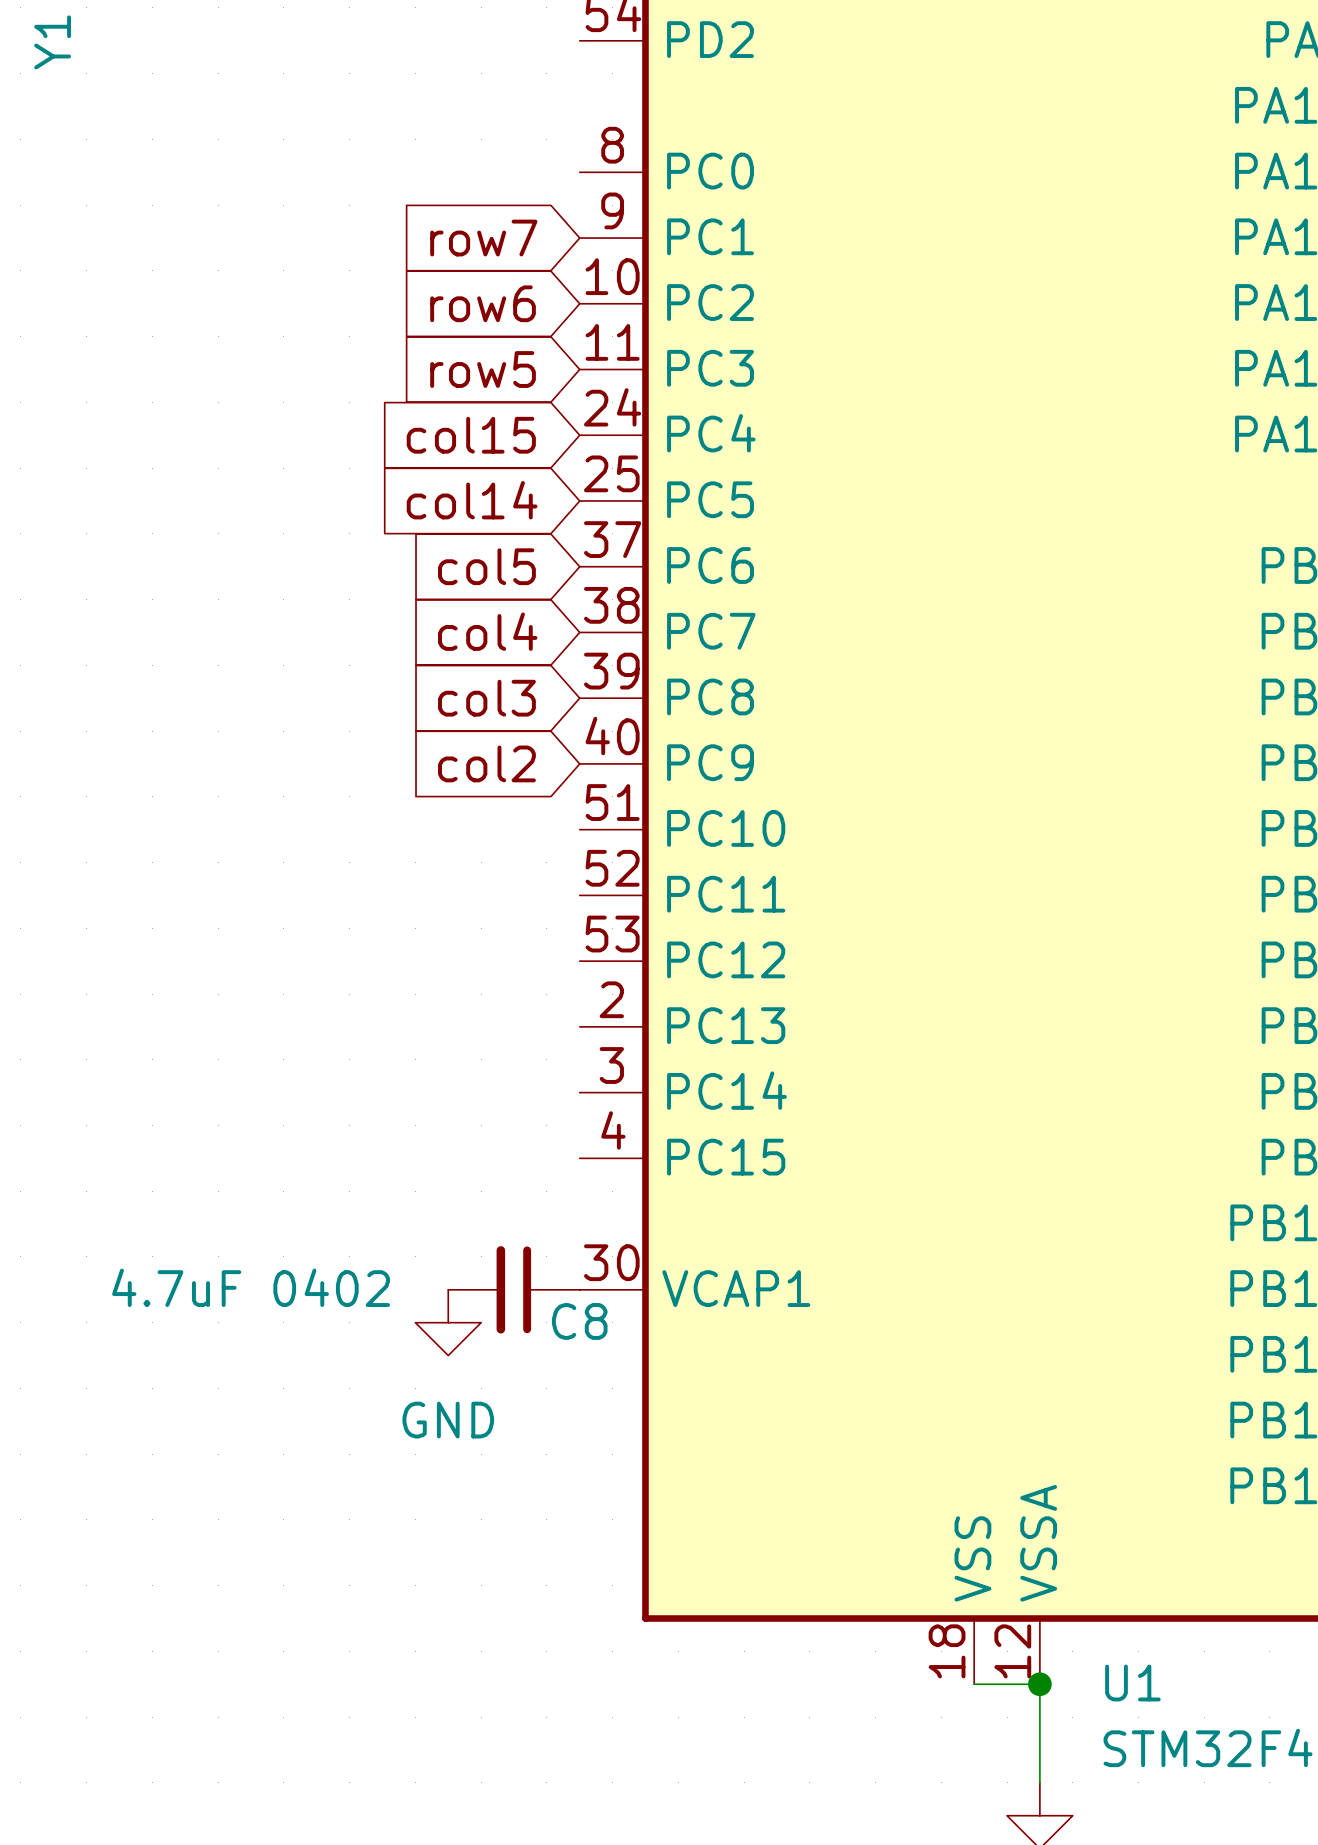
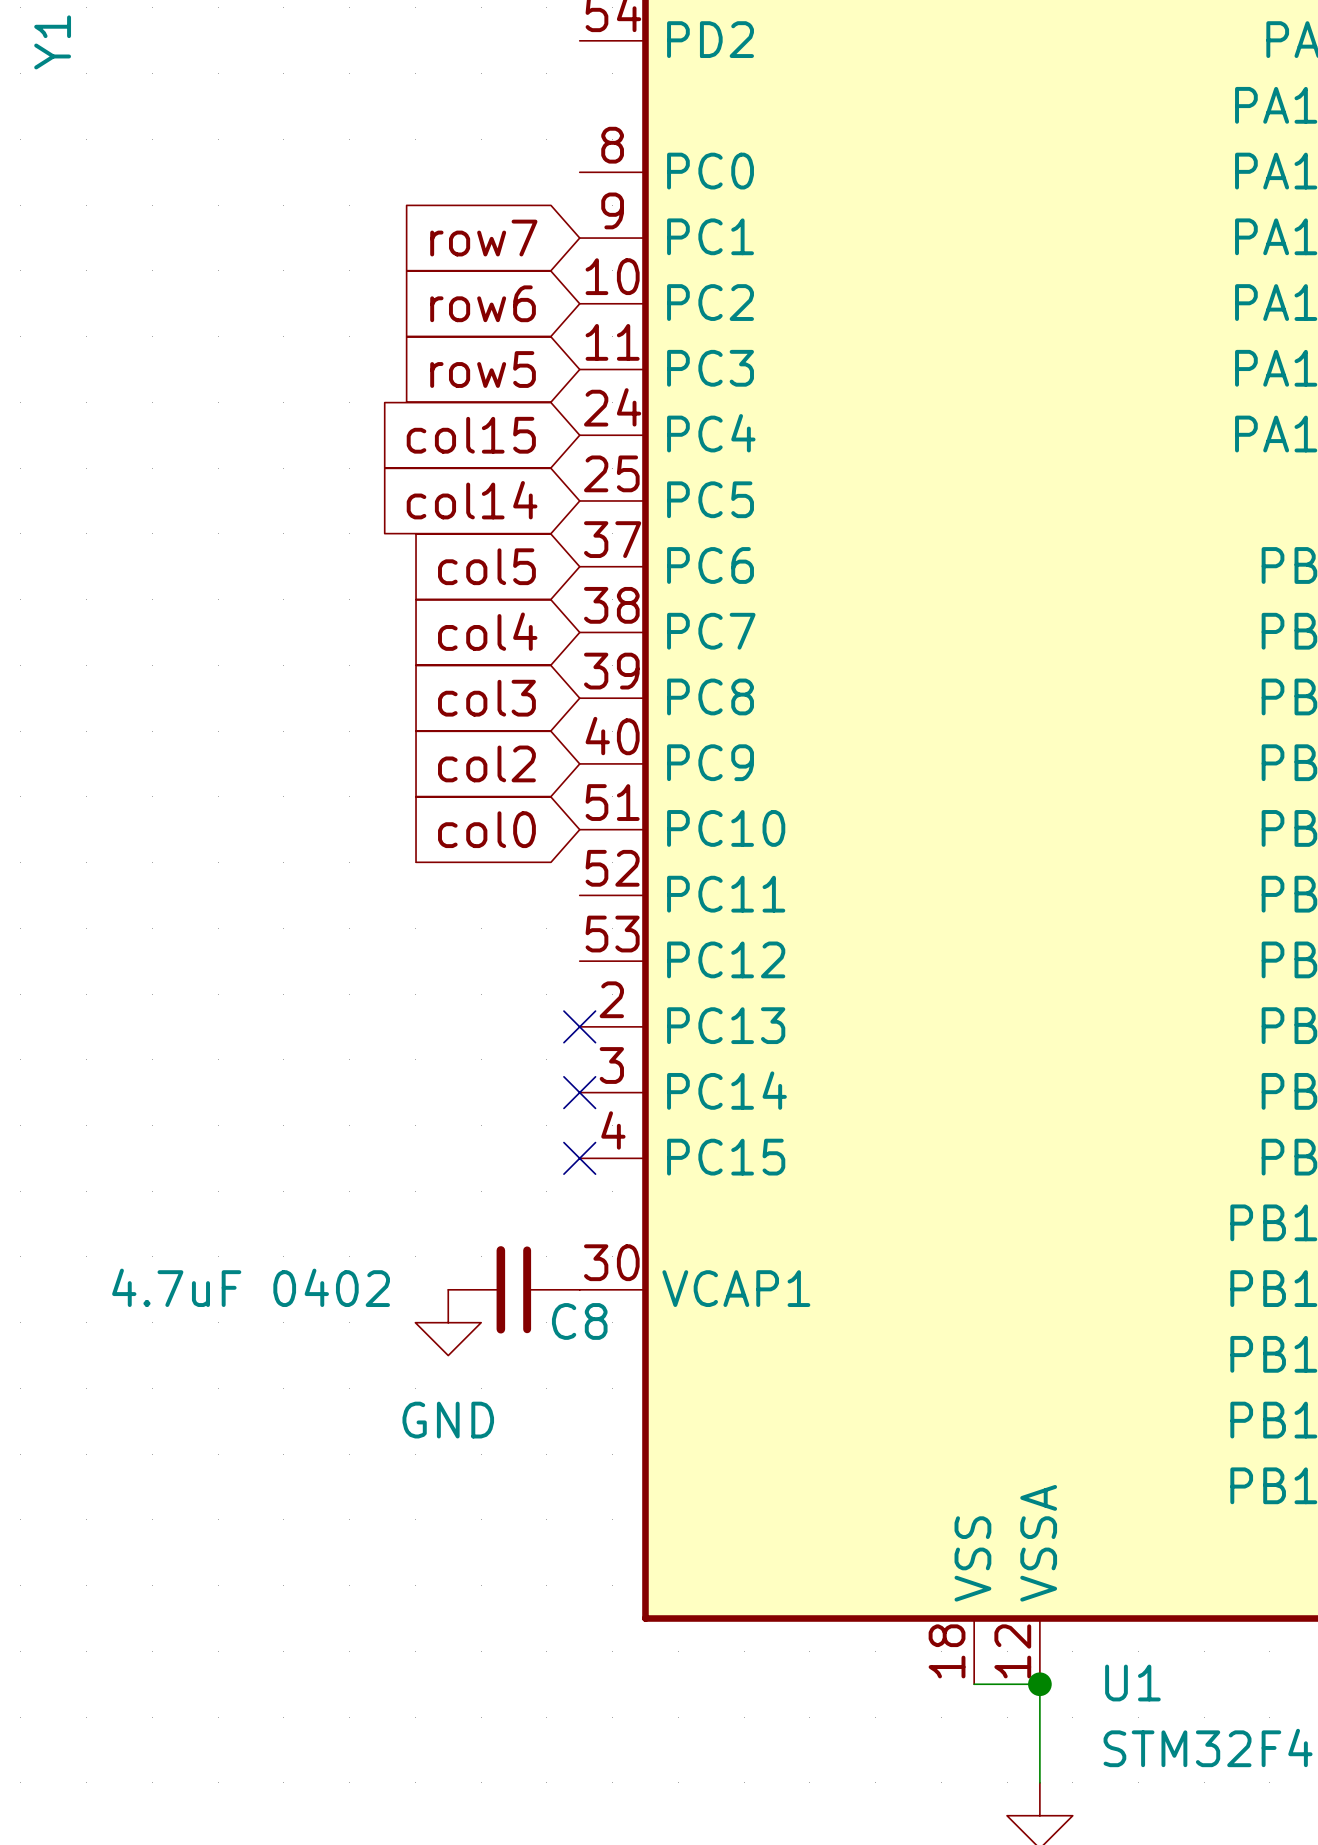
global label: none -> col0 (486, 829)
no-connect mark: none -> (579, 1026)
no-connect mark: none -> (579, 1092)
no-connect mark: none -> (579, 1158)

